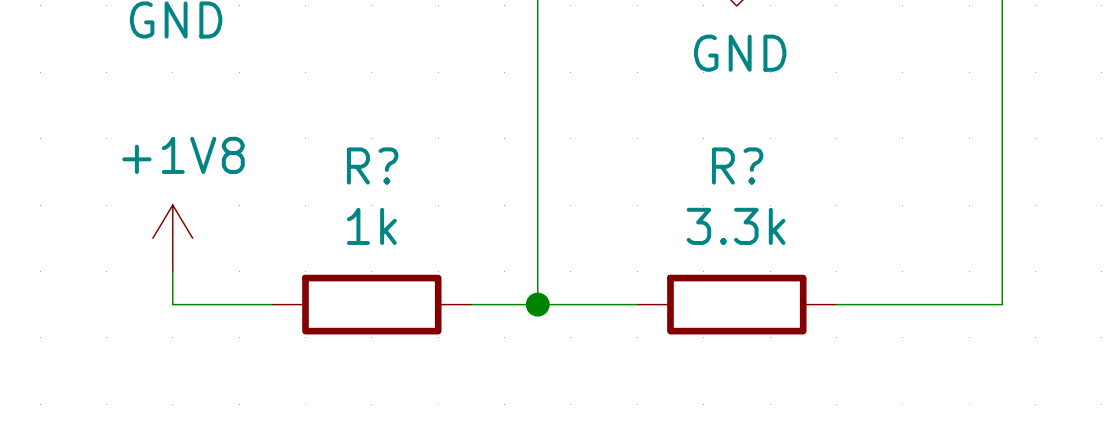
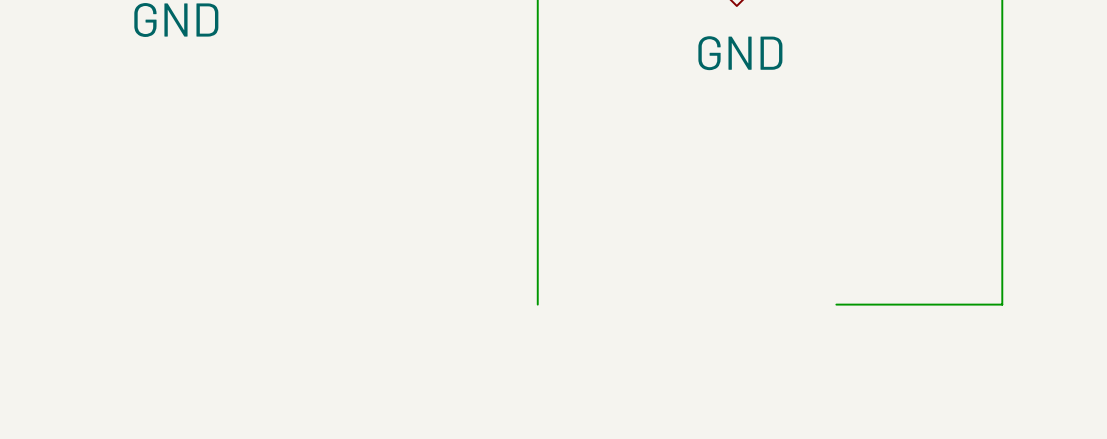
power symbol: +1V8 (172, 238) -> none
wire: (172, 271) (172, 304) (272, 304) -> none
R?: 1k (371, 304) -> none
wire: (471, 304) (637, 304) -> none
junction: (537, 304) -> none
R?: 3.3k (736, 304) -> none

